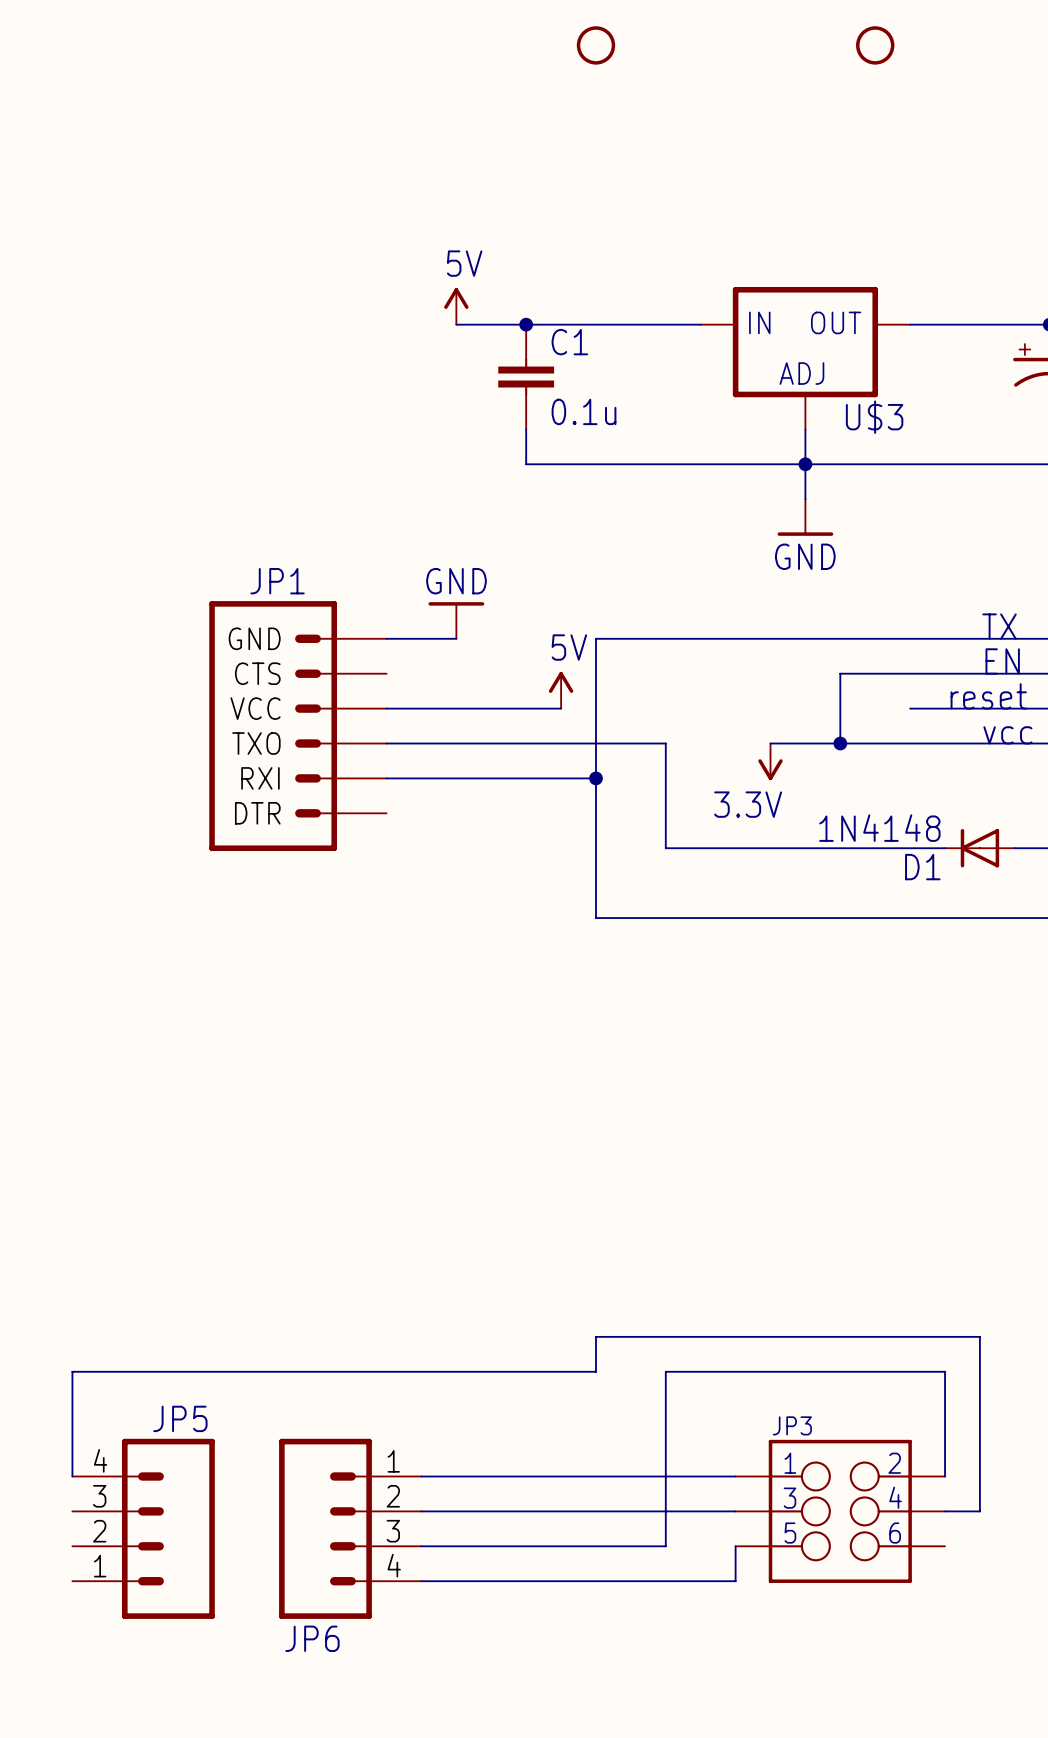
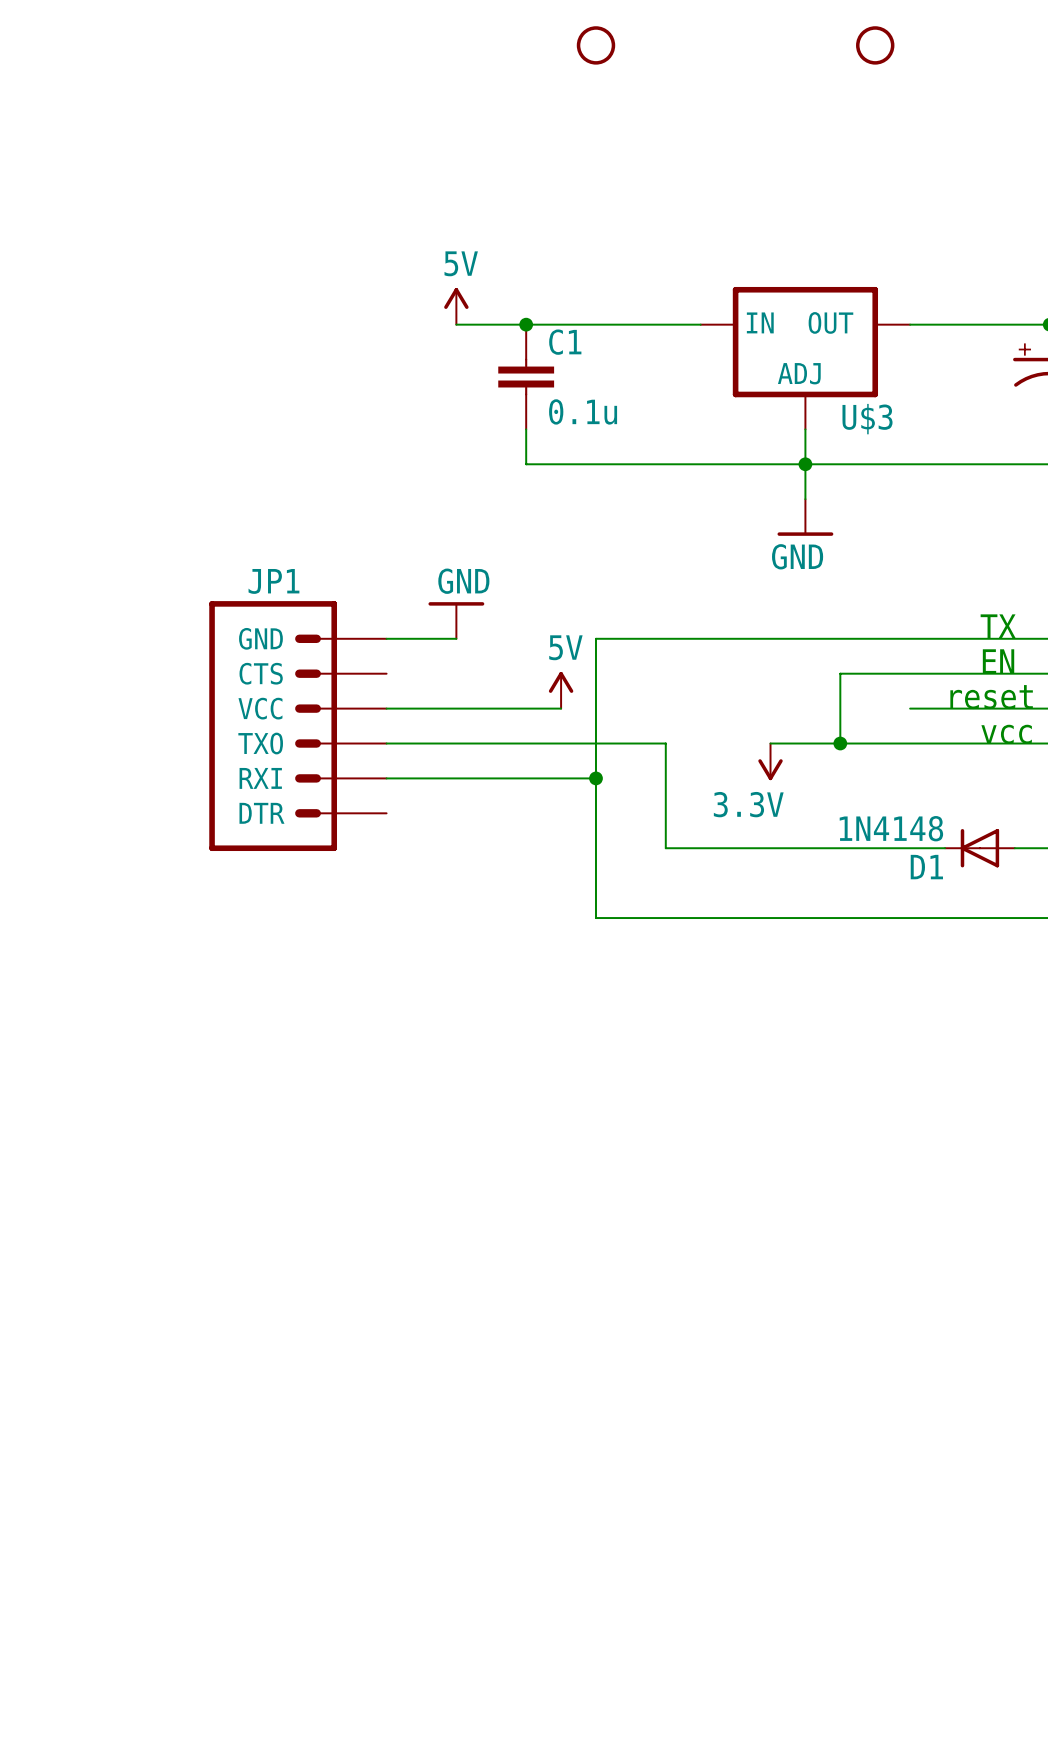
wire: (72, 1476) (72, 1371) (595, 1371) (595, 1336) (979, 1336) (979, 1511) (945, 1511) -> none
wire: (421, 1476) (735, 1476) -> none
wire: (945, 1476) (945, 1371) (665, 1371) (665, 1546) (421, 1546) -> none
wire: (421, 1511) (735, 1511) -> none
JP3: (840, 1511) -> none
JP5: (143, 1528) -> none
JP6: (350, 1528) -> none
wire: (735, 1546) (735, 1581) (421, 1581) -> none

